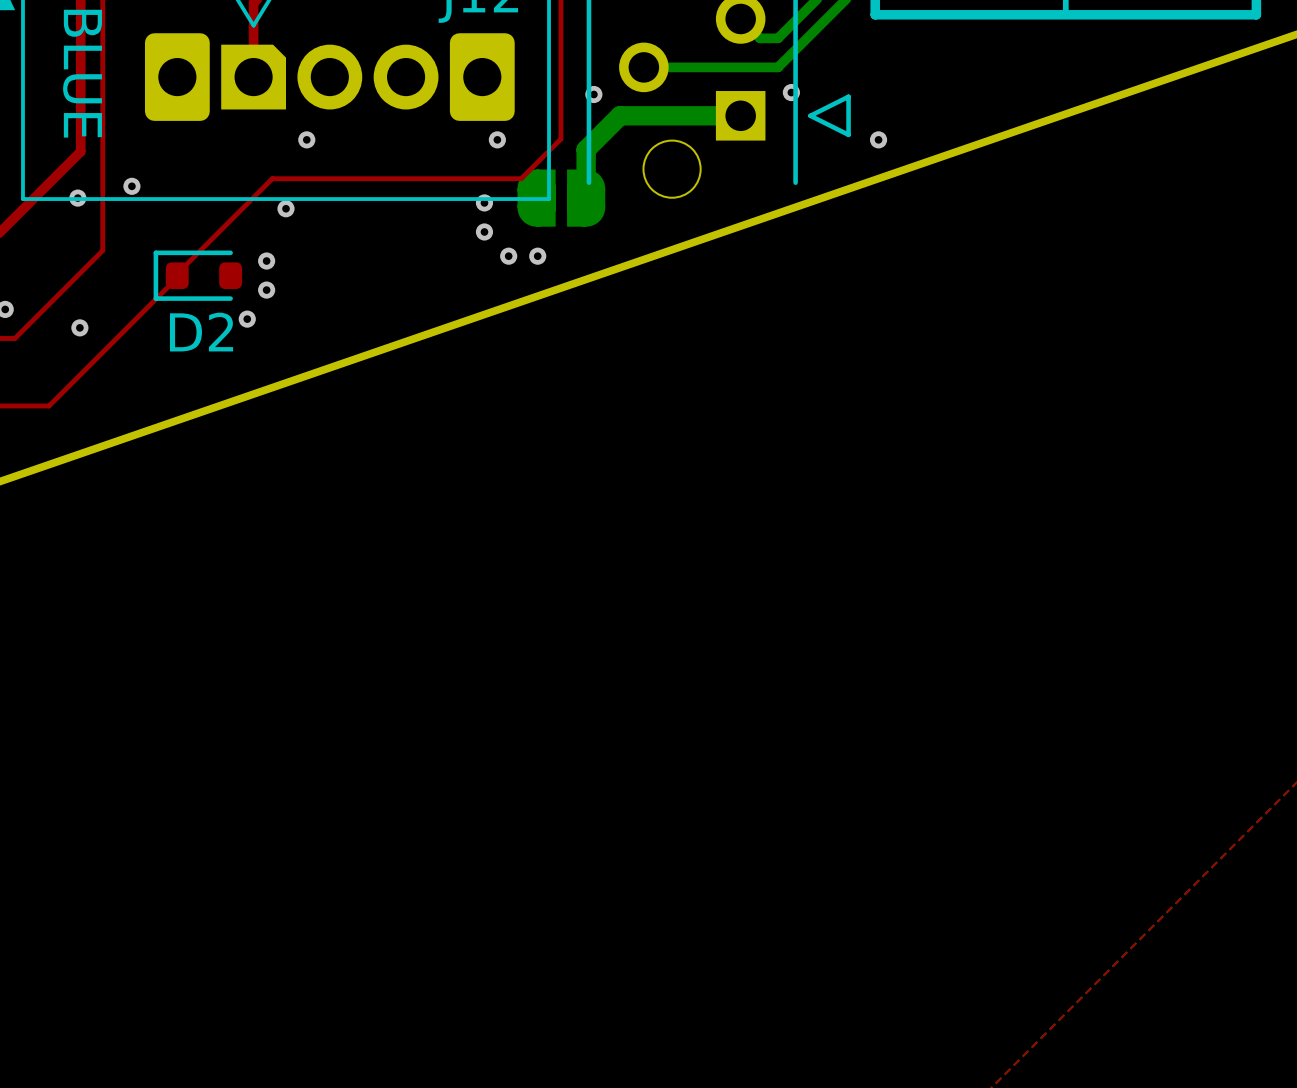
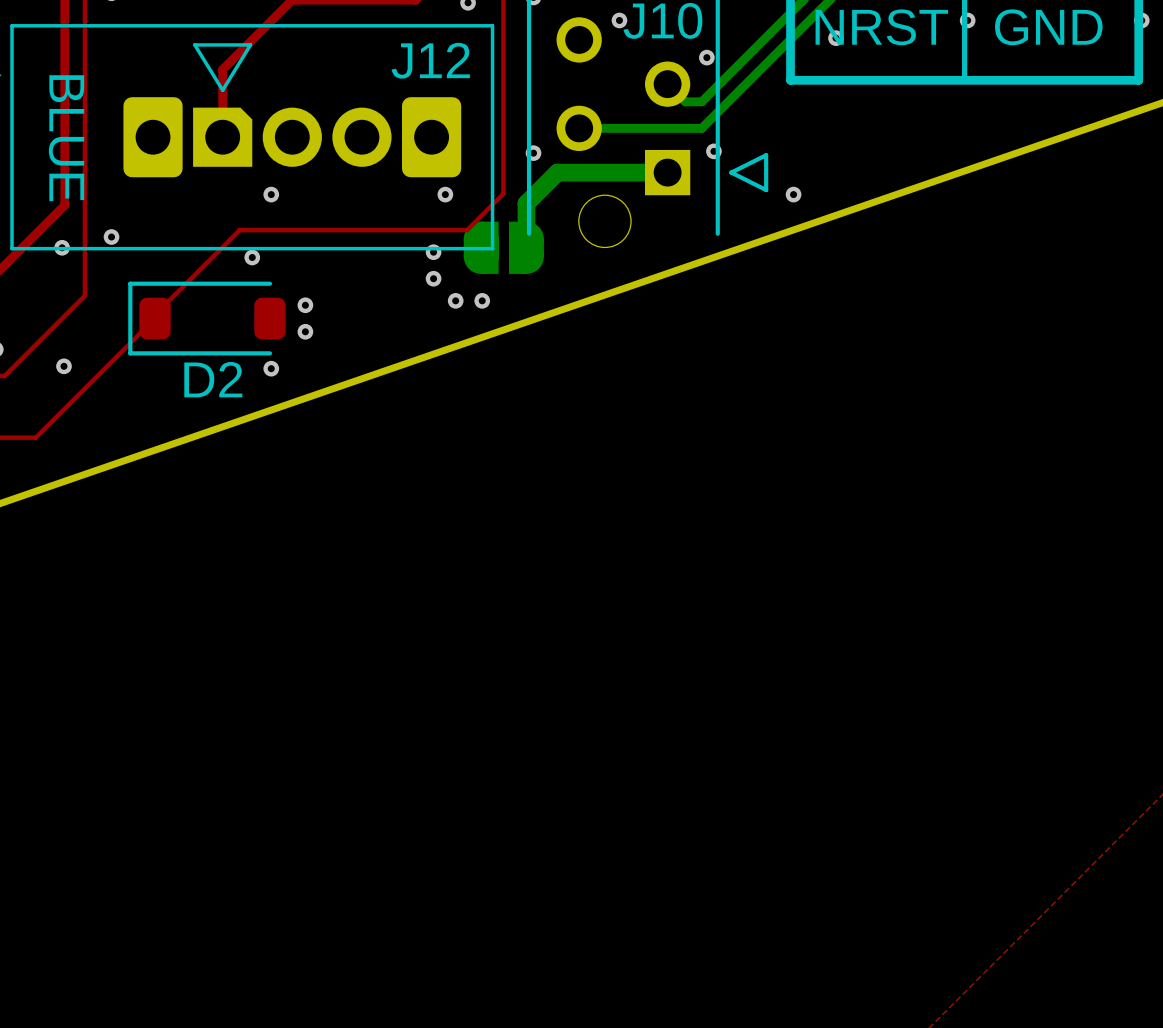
D2 footprint: [153, 250, 243, 301] -> [128, 281, 286, 356]
via: (266, 261) -> none
via: none -> (305, 305)
via: (266, 290) -> none
via: none -> (305, 331)
via: (247, 319) -> none
via: none -> (271, 368)

